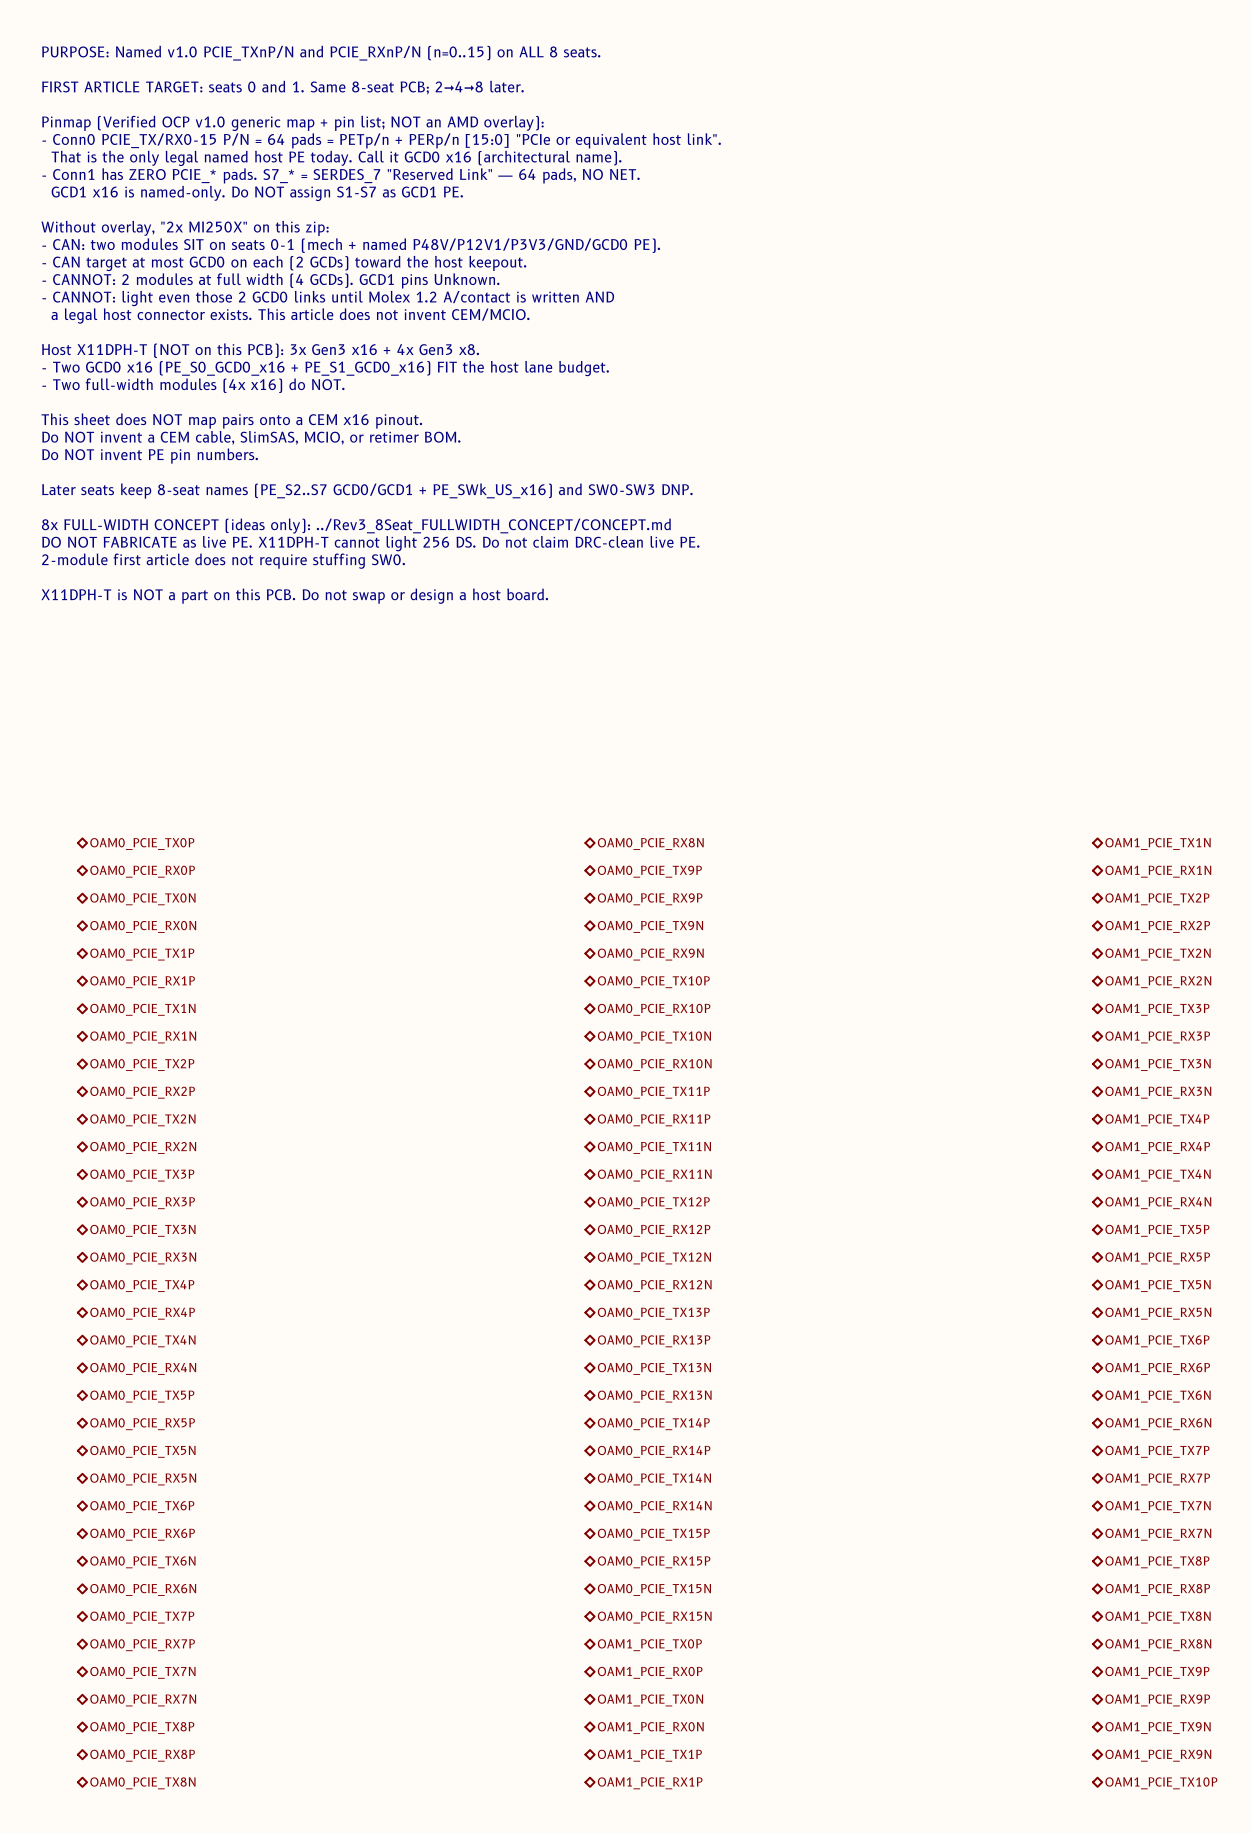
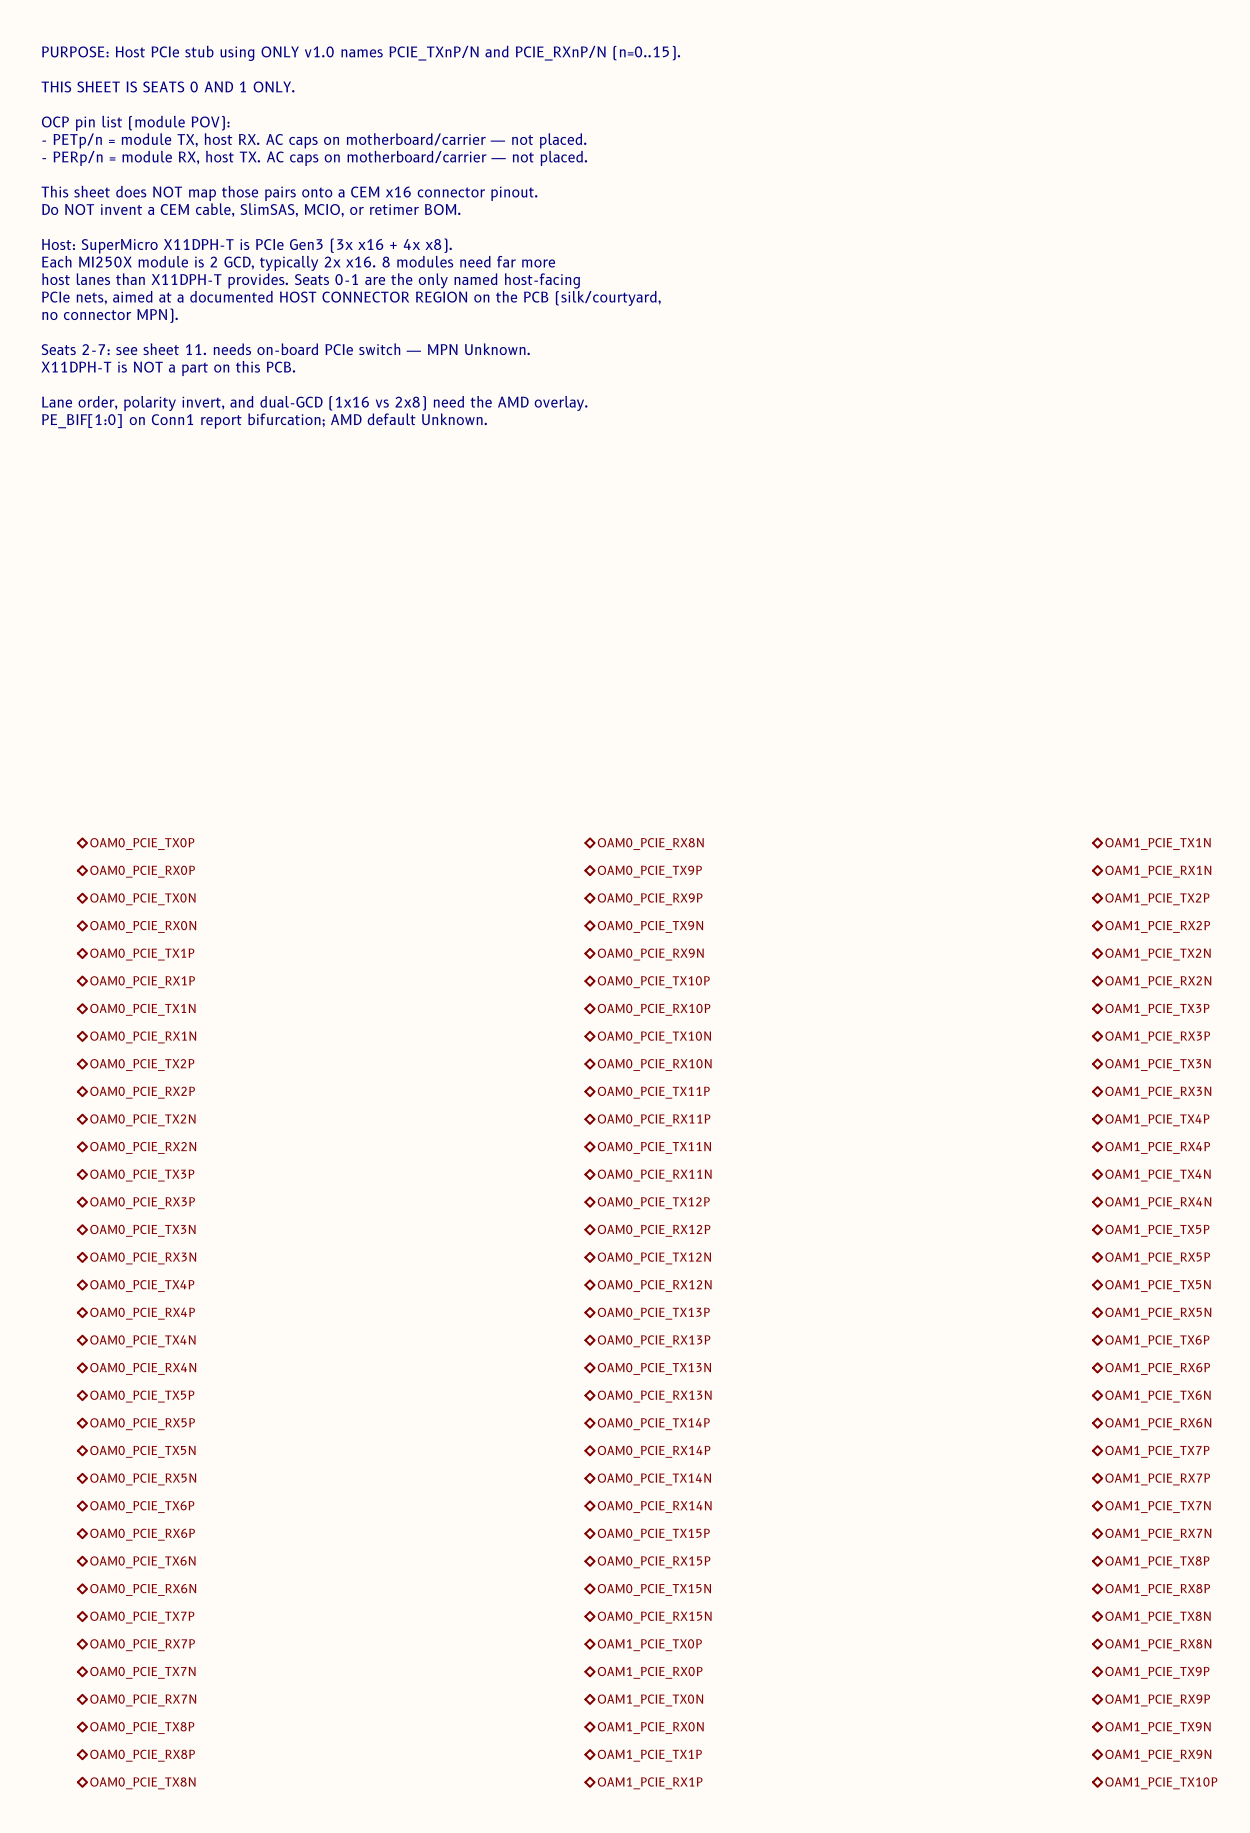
text: PURPOSE: Named v1.0 PCIE_TXnP/N and PCIE_RXnP/N (n=0..15) on ALL 8 seats. (321, 53) -> PURPOSE: Host PCIe stub using ONLY v1.0 names PCIE_TXnP/N and PCIE_RXnP/N (n=0..15). (361, 53)
text: FIRST ARTICLE TARGET: seats 0 and 1. Same 8-seat PCB; 2→4→8 later. (282, 87) -> THIS SHEET IS SEATS 0 AND 1 ONLY. (168, 86)
text: Pinmap (Verified OCP v1.0 generic map + pin list; NOT an AMD overlay): (292, 123) -> OCP pin list (module POV): (135, 123)
text: - Conn0 PCIE_TX/RX0-15 P/N = 64 pads = PETp/n + PERp/n [15:0] "PCIe or equivalent host link". (381, 140) -> - PETp/n = module TX, host RX. AC caps on motherboard/carrier — not placed. (314, 140)
text: That is the only legal named host PE today. Call it GCD0 x16 (architectural name). (336, 158) -> - PERp/n = module RX, host TX. AC caps on motherboard/carrier — not placed. (314, 158)
text: - Conn1 has ZERO PCIE_* pads. S7_* = SERDES_7 "Reserved Link" — 64 pads, NO NET. (341, 175) -> none
text: GCD1 x16 is named-only. Do NOT assign S1-S7 as GCD1 PE. (257, 193) -> This sheet does NOT map those pairs onto a CEM x16 connector pinout. (289, 193)
text: none -> Do NOT invent a CEM cable, SlimSAS, MCIO, or retimer BOM. (251, 210)
text: Without overlay, "2x MI250X" on this zip: (185, 228) -> none
text: - CAN: two modules SIT on seats 0-1 (mech + named P48V/P12V1/P3V3/GND/GCD0 PE). (351, 245) -> Host: SuperMicro X11DPH-T is PCIe Gen3 (3x x16 + 4x x8). (246, 245)
text: - CAN target at most GCD0 on each (2 GCDs) toward the host keepout. (284, 263) -> Each MI250X module is 2 GCD, typically 2x x16. 8 modules need far more (298, 263)
text: - CANNOT: 2 modules at full width (4 GCDs). GCD1 pins Unknown. (270, 280) -> host lanes than X11DPH-T provides. Seats 0-1 are the only named host-facing (311, 281)
text: - CANNOT: light even those 2 GCD0 links until Molex 1.2 A/contact is written AND (328, 298) -> PCIe nets, aimed at a documented HOST CONNECTOR REGION on the PCB (silk/courtyard, (351, 298)
text: a legal host connector exists. This article does not invent CEM/MCIO. (290, 316) -> no connector MPN). (110, 315)
text: Host X11DPH-T (NOT on this PCB): 3x Gen3 x16 + 4x Gen3 x8. (260, 350) -> Seats 2-7: see sheet 11. needs on-board PCIe switch — MPN Unknown. (285, 349)
text: - Two GCD0 x16 (PE_S0_GCD0_x16 + PE_S1_GCD0_x16) FIT the host lane budget. (325, 368) -> X11DPH-T is NOT a part on this PCB. (168, 368)
text: - Two full-width modules (4x x16) do NOT. (193, 385) -> none
text: none -> Lane order, polarity invert, and dual-GCD (1x16 vs 2x8) need the AMD overlay. (314, 403)
text: This sheet does NOT map pairs onto a CEM x16 pinout. (231, 421) -> PE_BIF[1:0] on Conn1 report bifurcation; AMD default Unknown. (264, 421)
text: Do NOT invent a CEM cable, SlimSAS, MCIO, or retimer BOM. (251, 437) -> none
text: Do NOT invent PE pin numbers. (150, 456) -> none
text: Later seats keep 8-seat names (PE_S2..S7 GCD0/GCD1 + PE_SWk_US_x16) and SW0-SW3 DNP. (367, 491) -> none
text: 8x FULL-WIDTH CONCEPT (ideas only): ../Rev3_8Seat_FULLWIDTH_CONCEPT/CONCEPT.md (356, 526) -> none
text: DO NOT FABRICATE as live PE. X11DPH-T cannot light 256 DS. Do not claim DRC-clean live PE. (370, 543) -> none
text: 2-module first article does not require stuffing SW0. (223, 561) -> none
text: X11DPH-T is NOT a part on this PCB. Do not swap or design a host board. (294, 596) -> none

